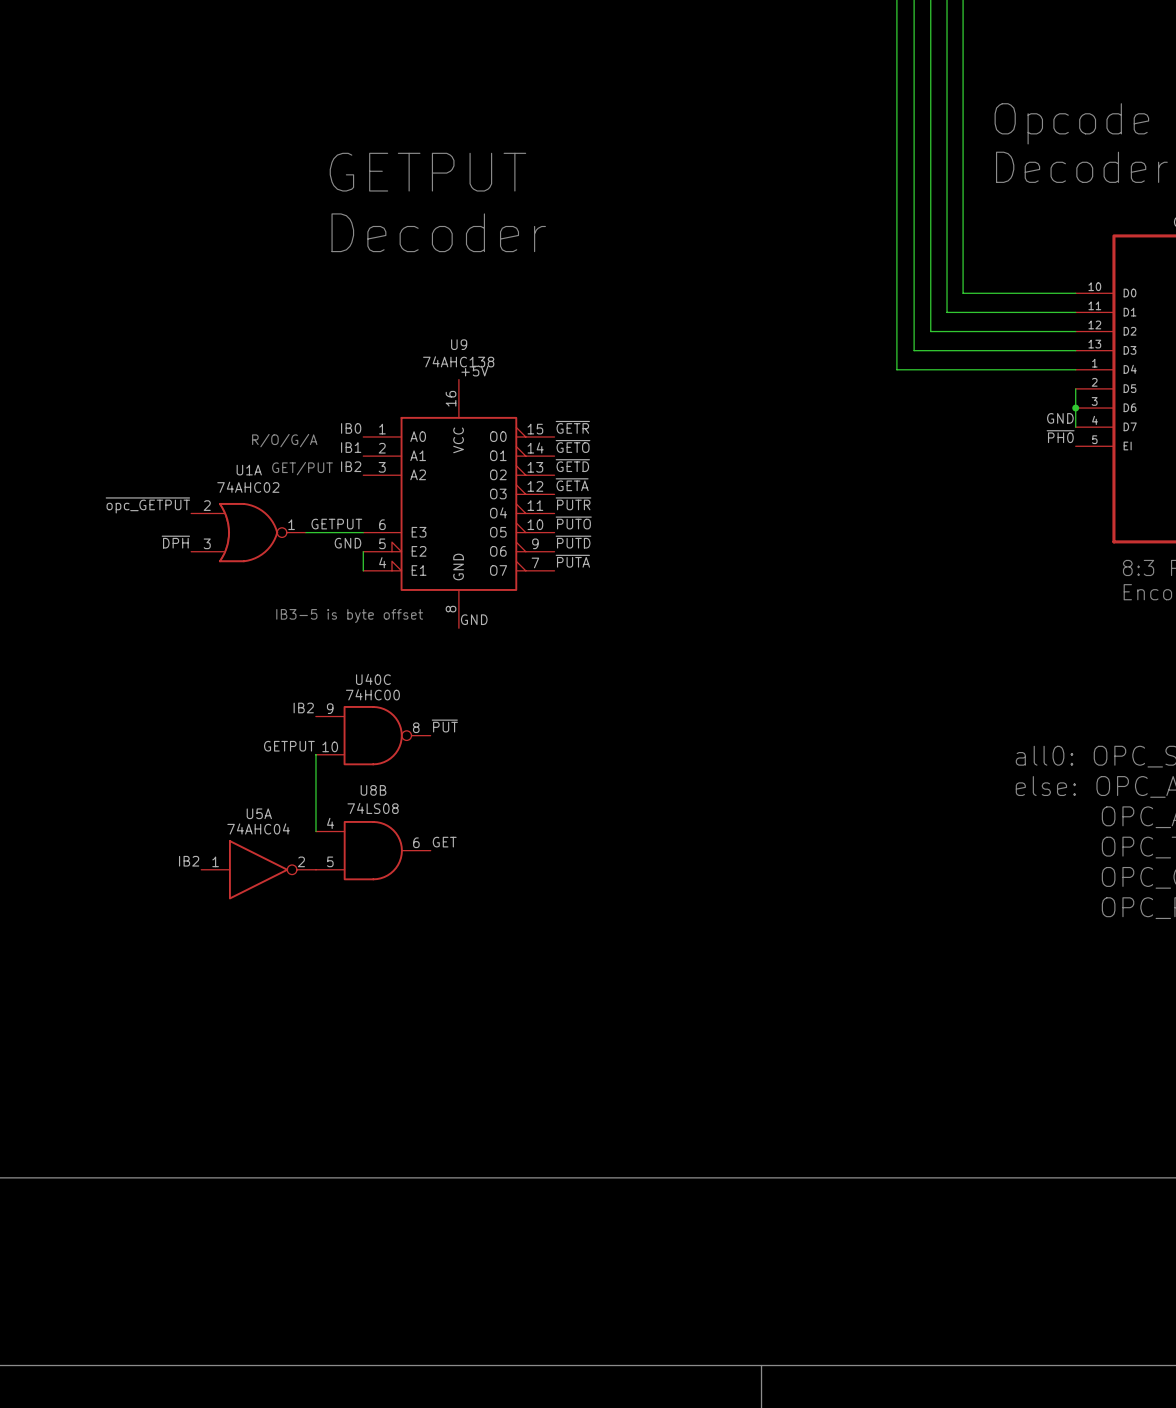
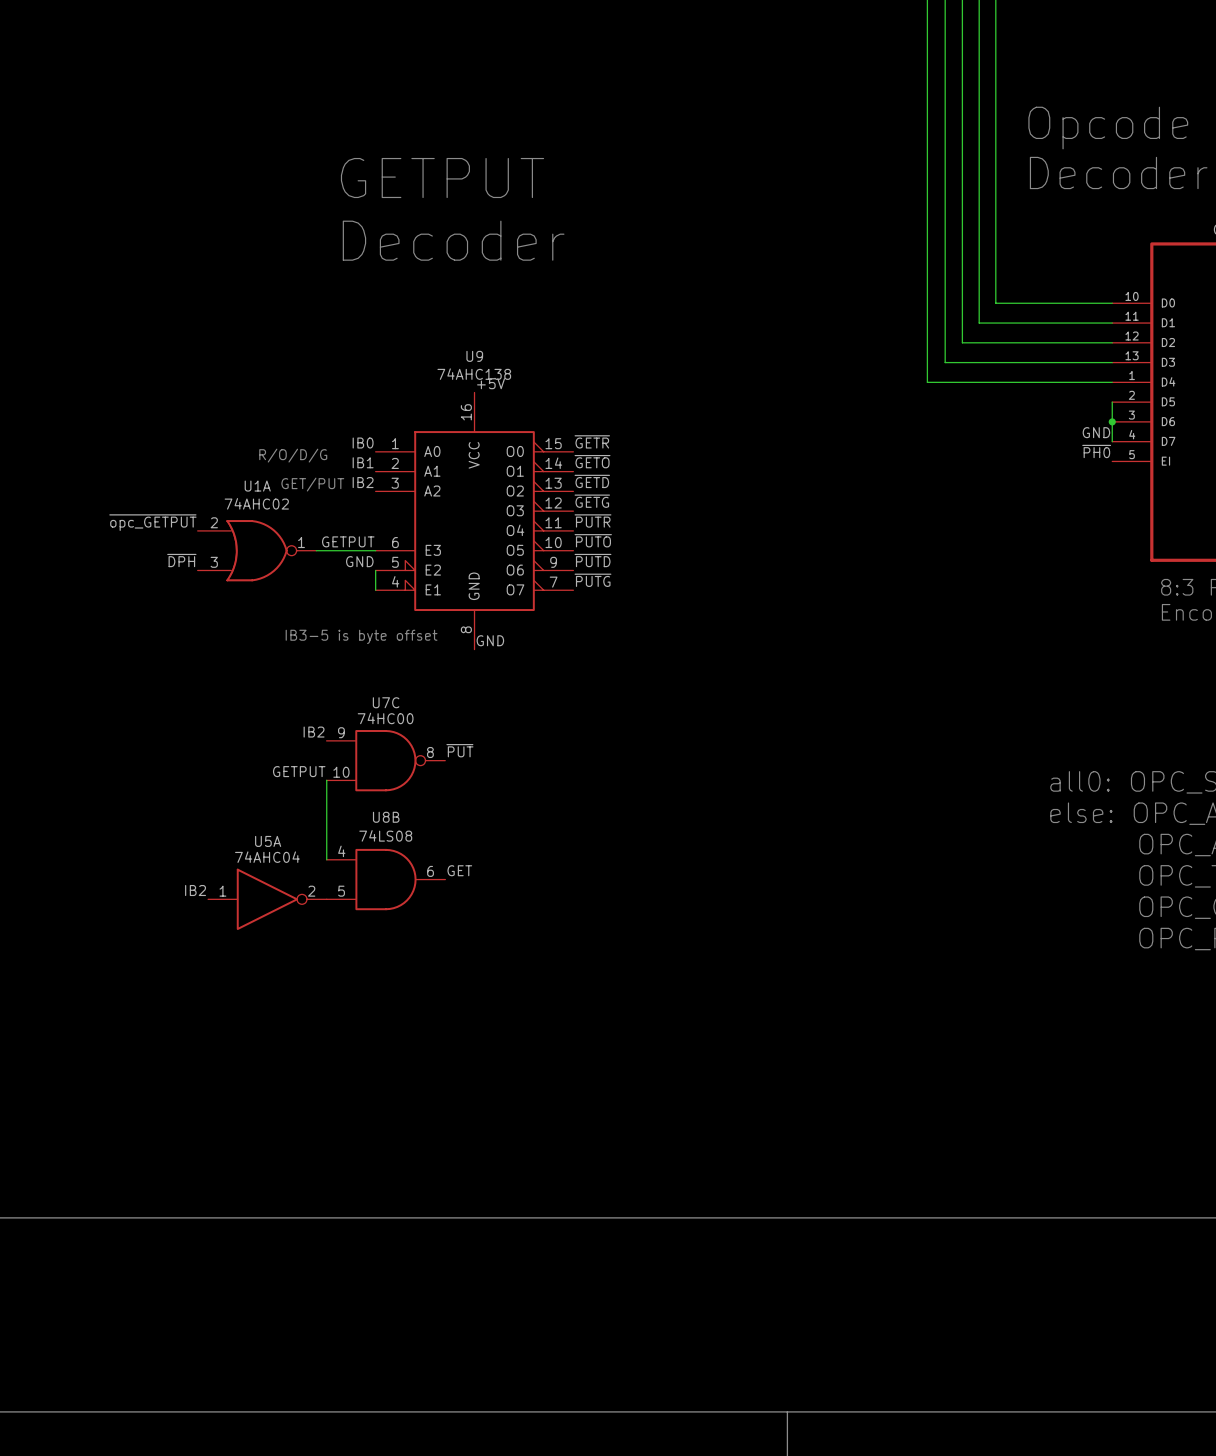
text: R/O/G/A (284, 440) -> R/O/D/G (293, 455)
label: ~{GETA} (572, 484) -> ~{GETG} (592, 501)
label: ~{PUTA} (572, 561) -> ~{PUTG} (592, 580)
U40C name: U40C (373, 679) -> U7C (386, 702)

